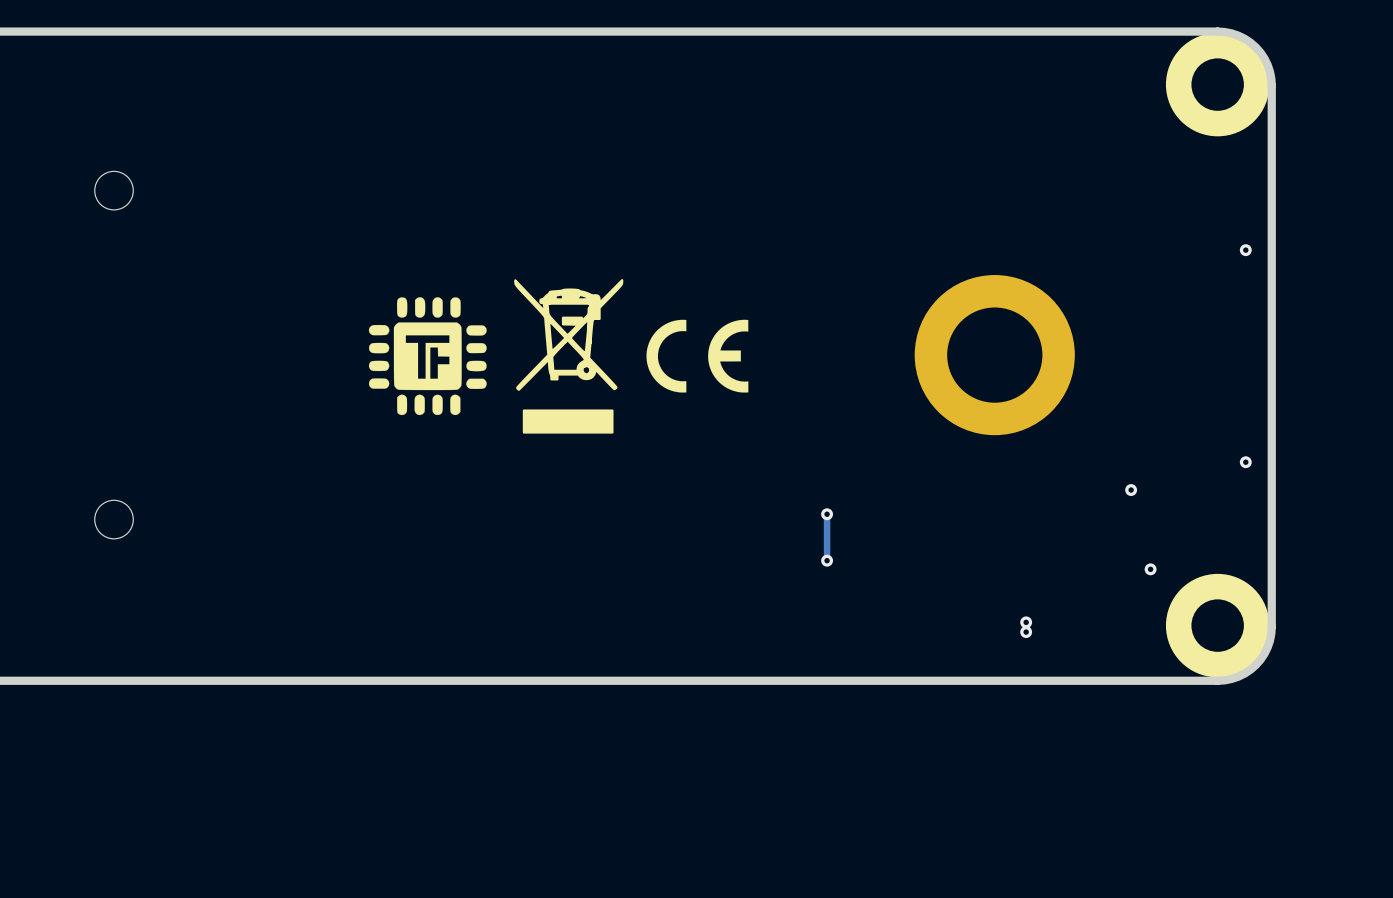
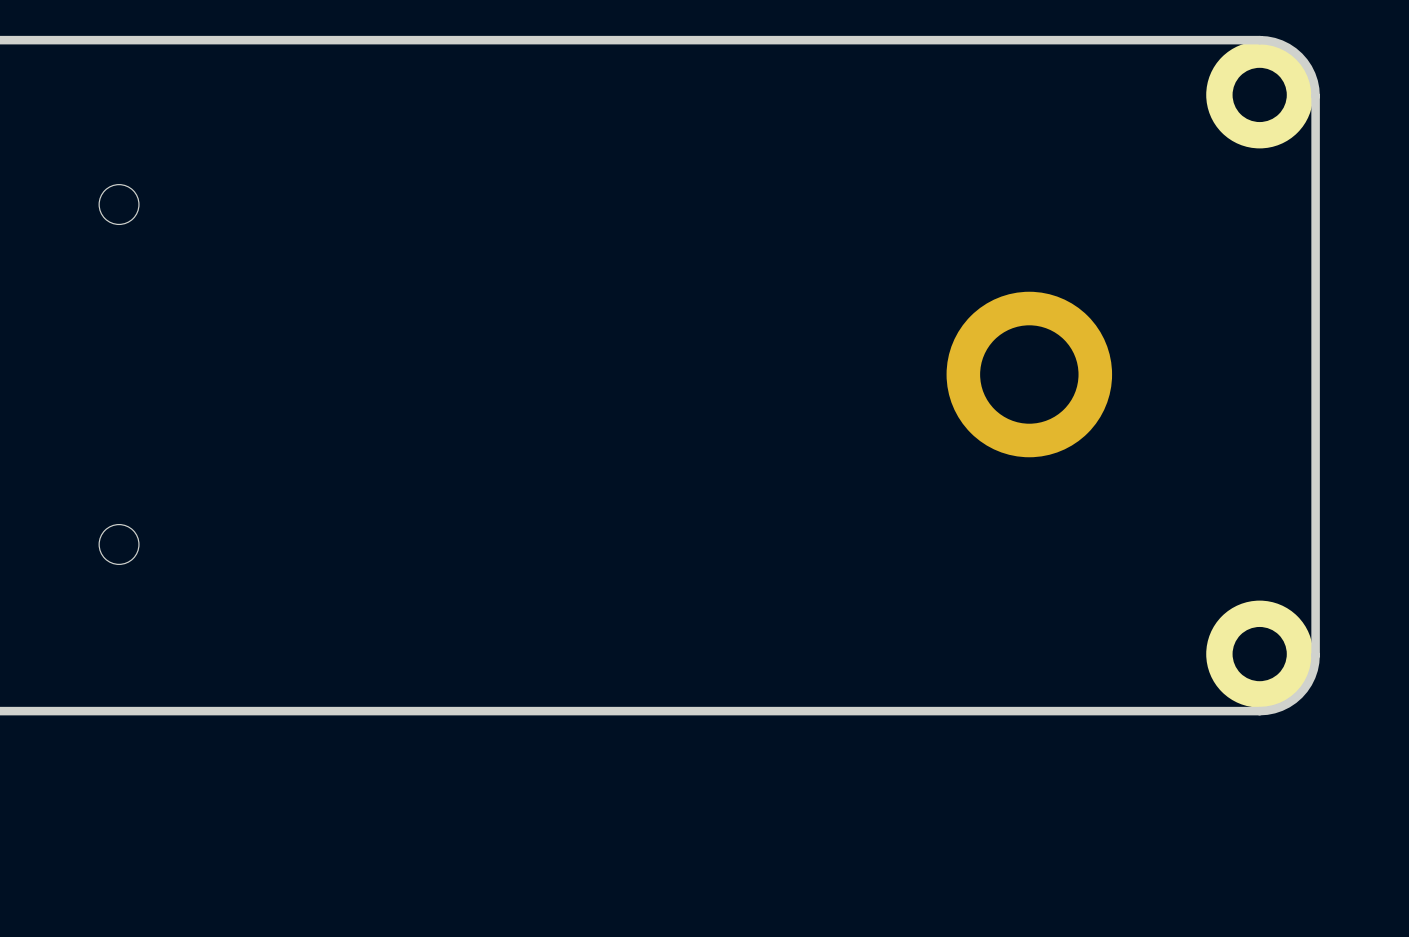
via: (1245, 250) -> none
drawing: [514, 279, 749, 434] -> none
drawing: [368, 297, 487, 416] -> none
via: (1245, 462) -> none
via: (1131, 490) -> none
track: (827, 514) (827, 560) -> none
via: (827, 514) -> none
via: (827, 560) -> none
via: (1150, 569) -> none
via: (1026, 622) -> none
via: (1026, 632) -> none

